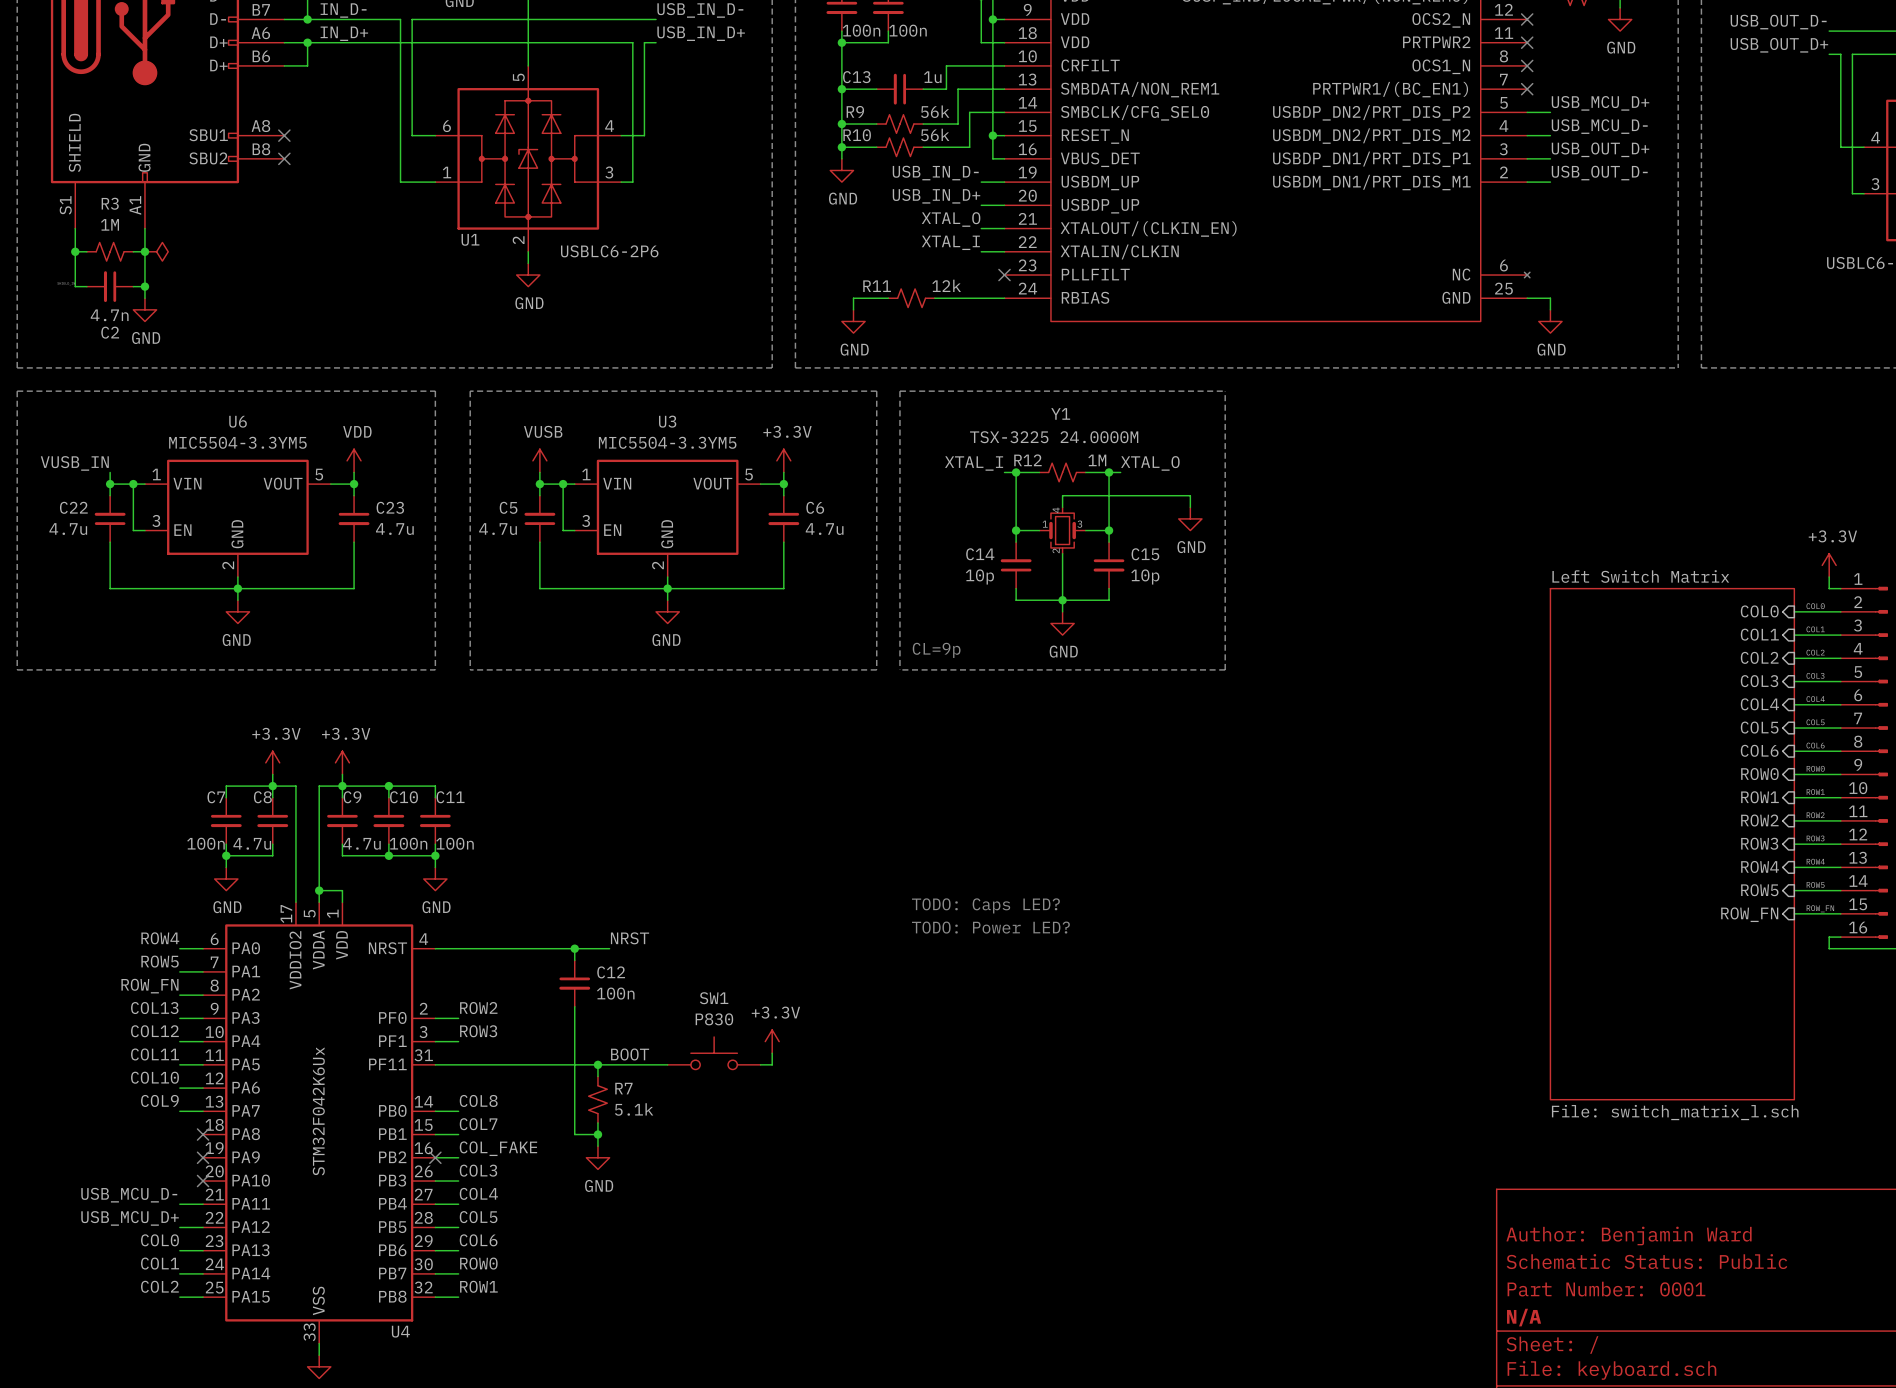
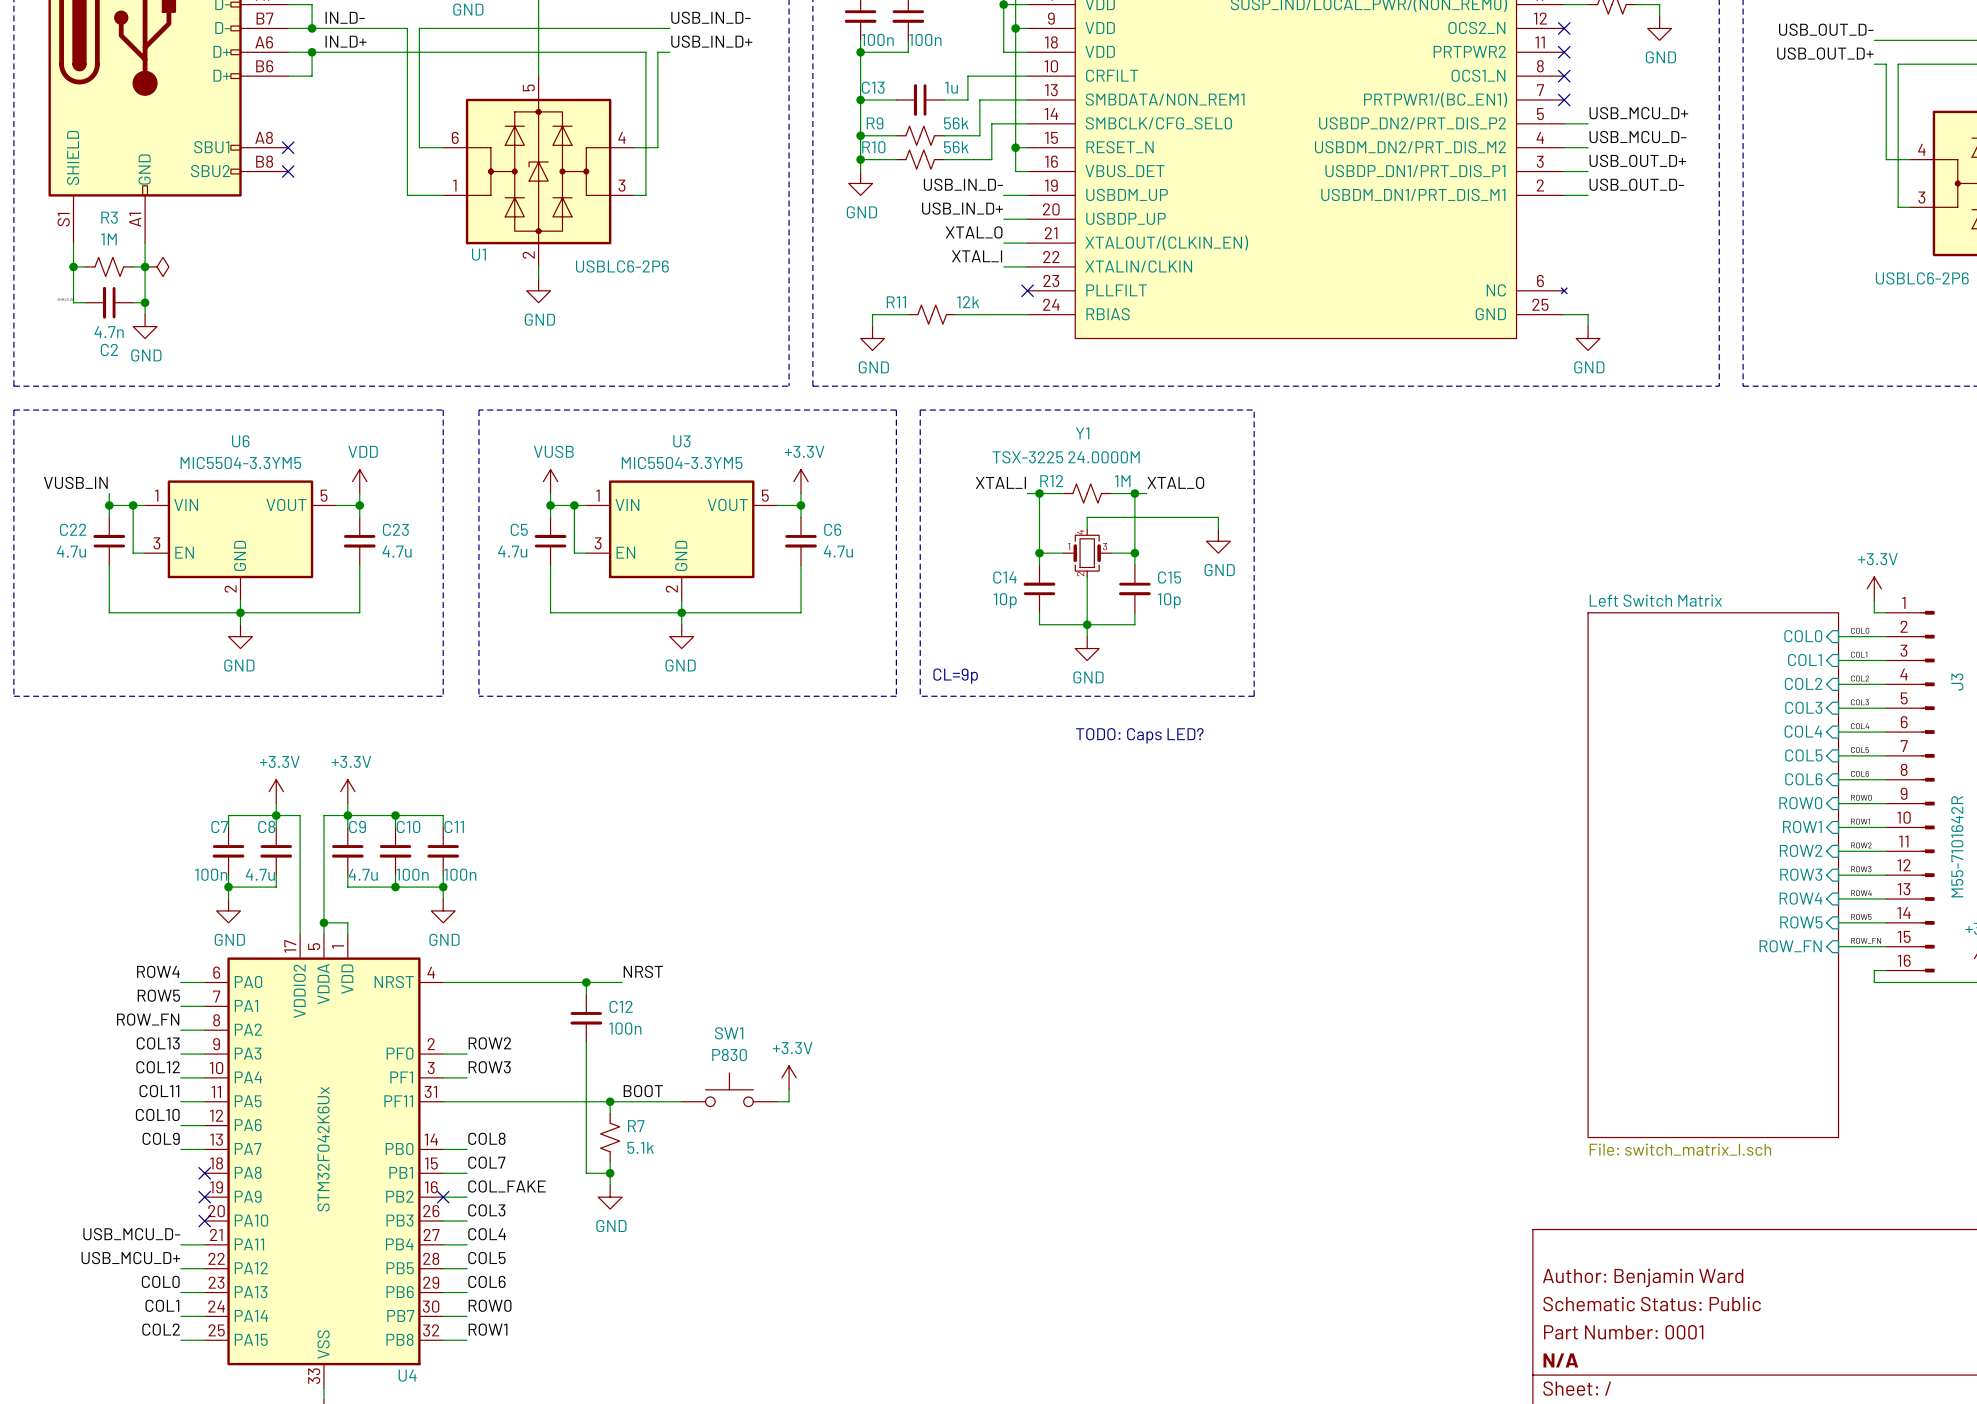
text: none -> TODO: Caps LED? (1139, 735)
text: TODO: Caps LED? (985, 905) -> none
text: TODO: Power LED? (990, 927) -> none

